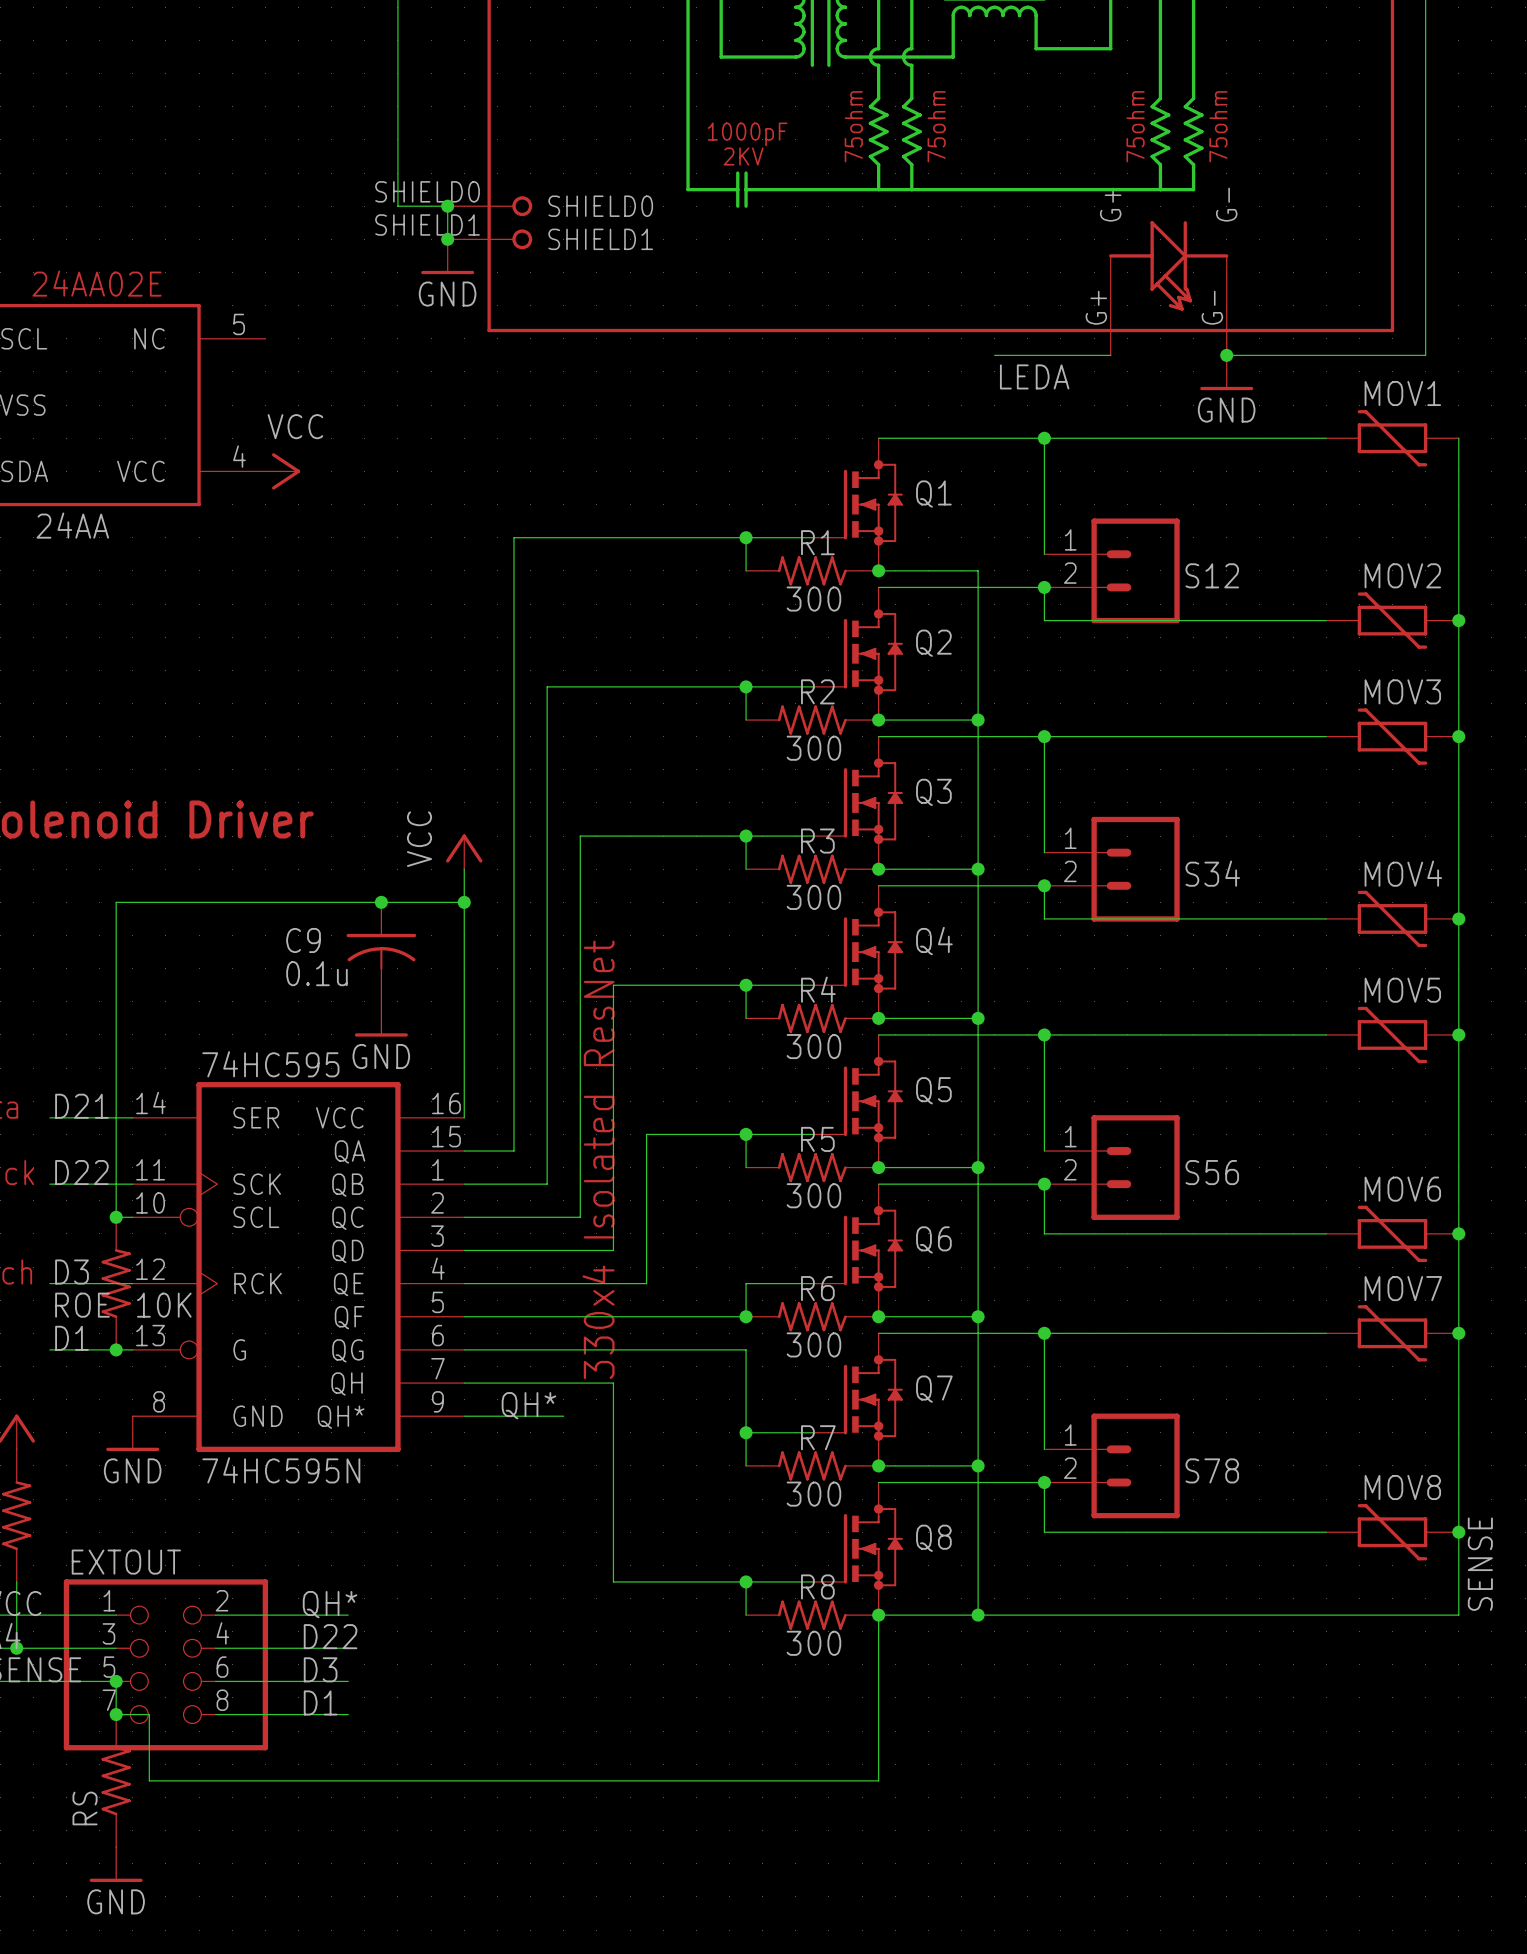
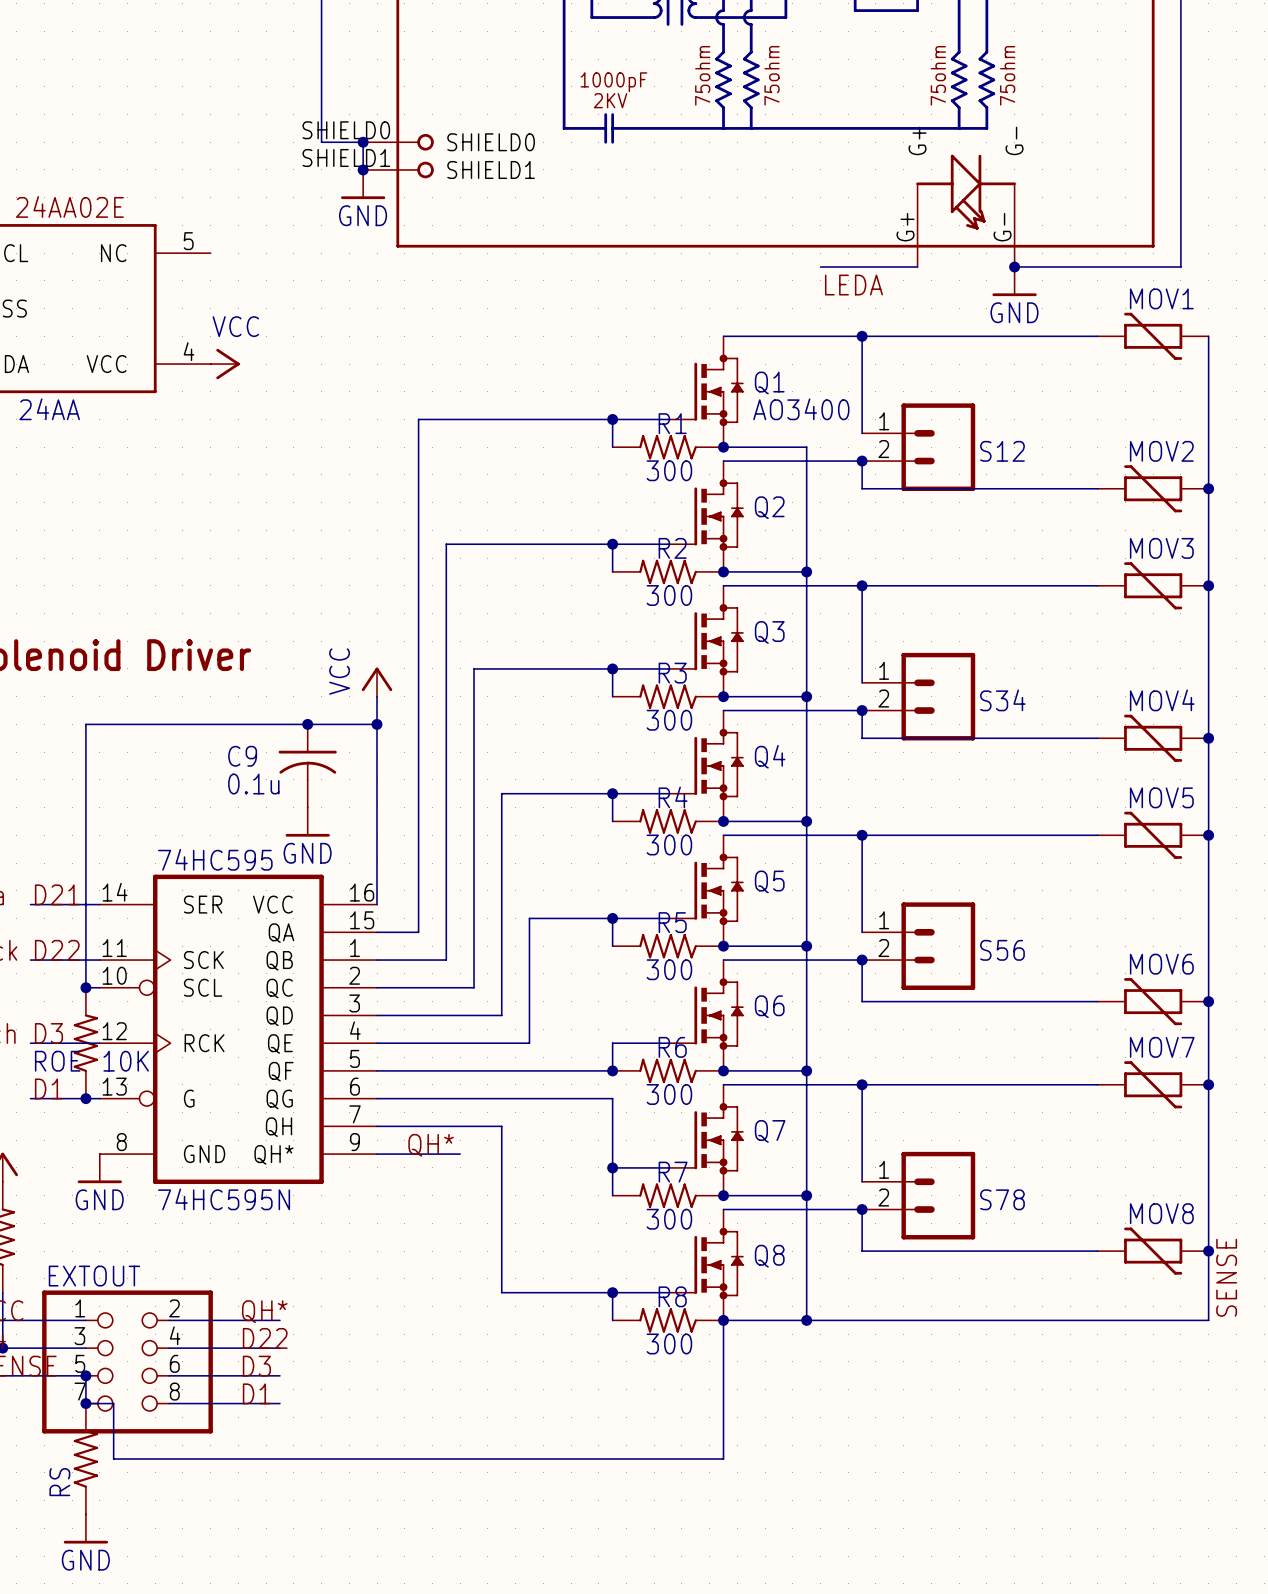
Q1 value: none -> AO3400 (801, 409)
text: 330x4 Isolated ResNet (598, 1159) -> none

